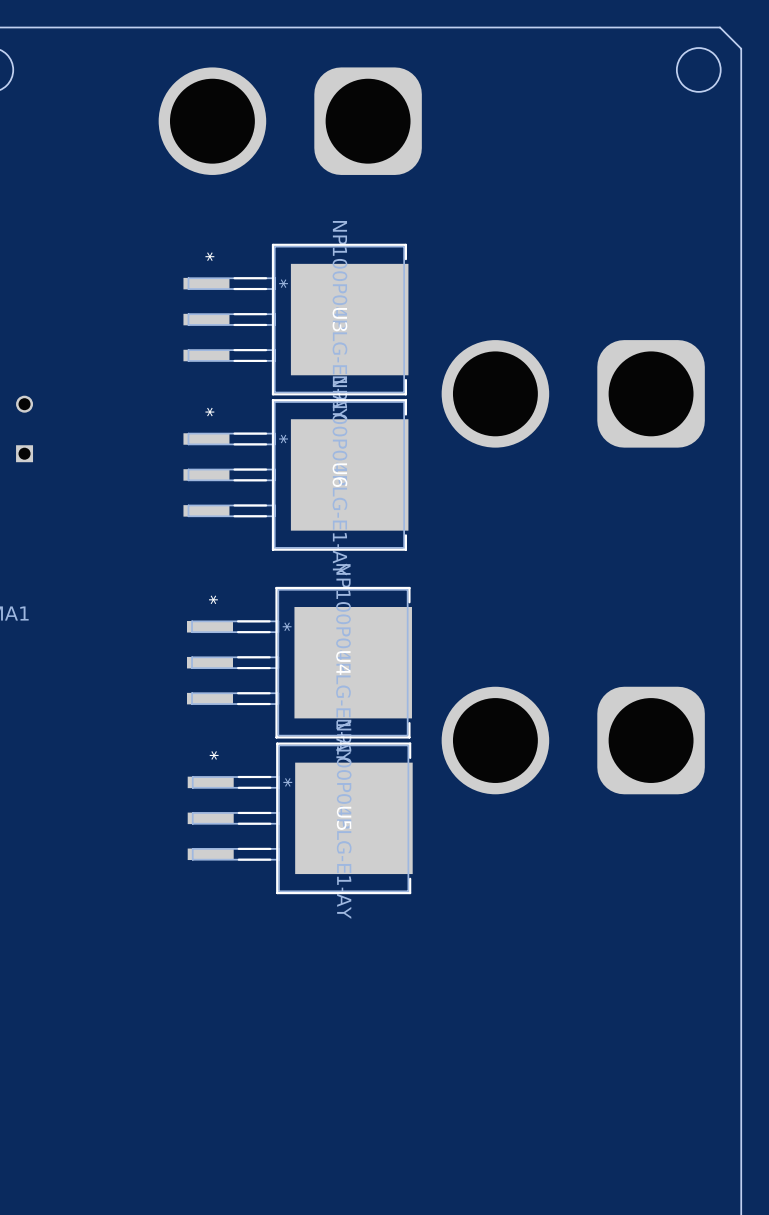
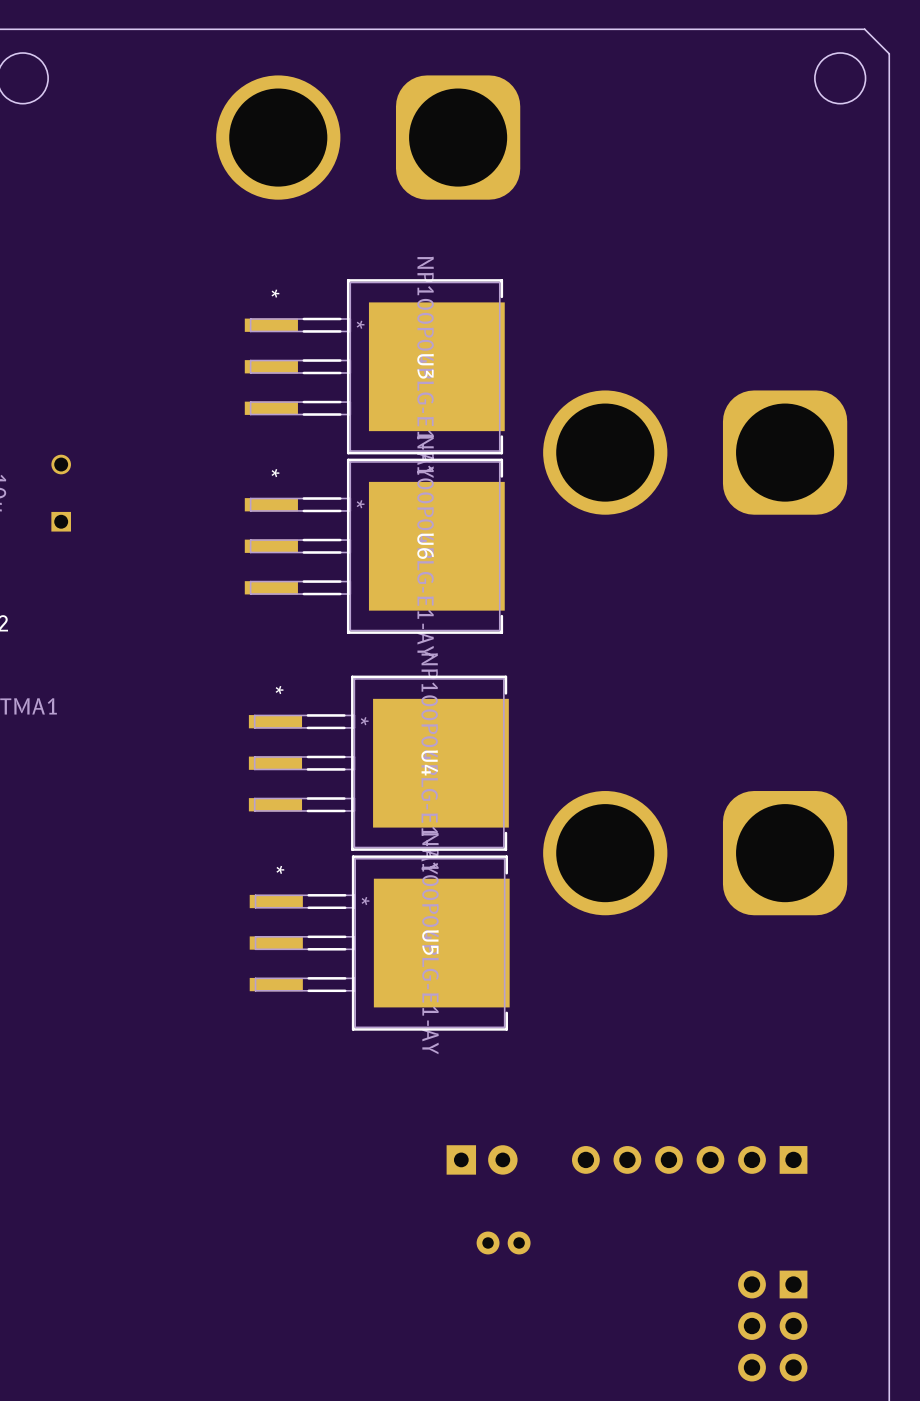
part: none -> (482, 1159)
part: none -> (689, 1159)
part: none -> (503, 1242)
part: none -> (772, 1326)

